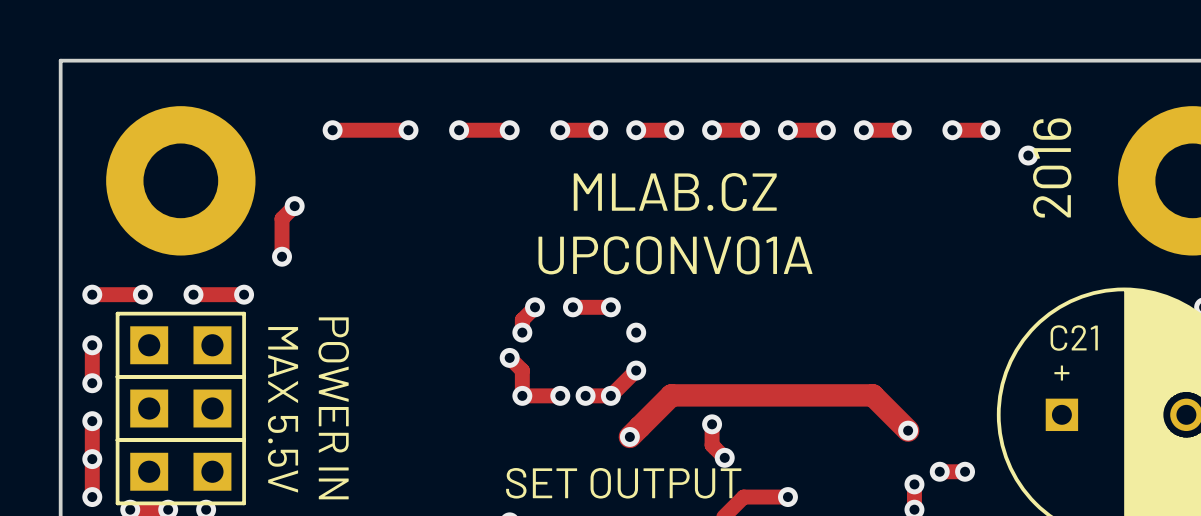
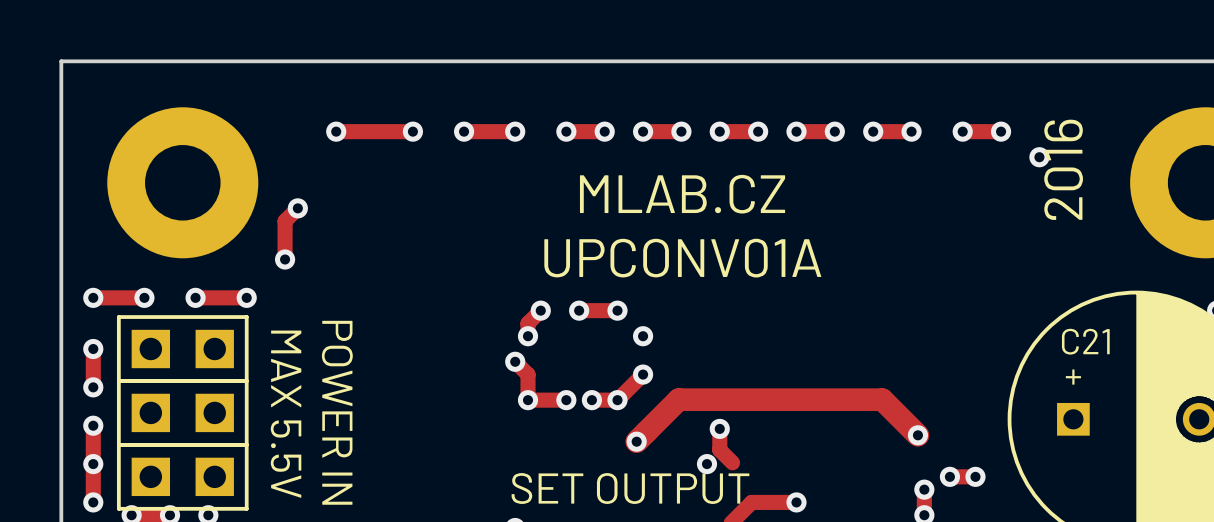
via position: (724, 457) -> (707, 464)

